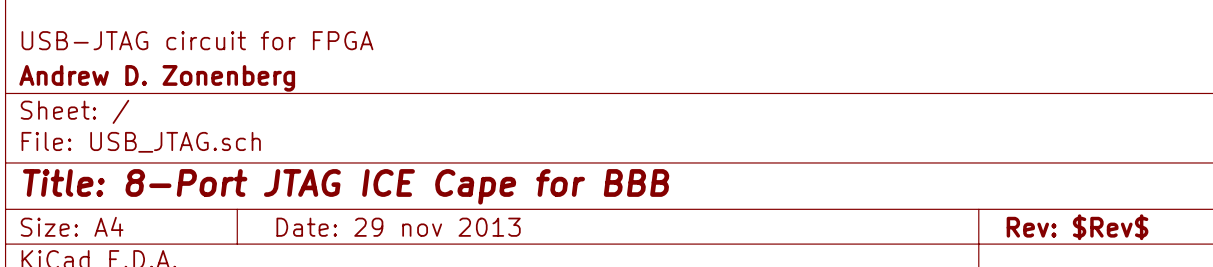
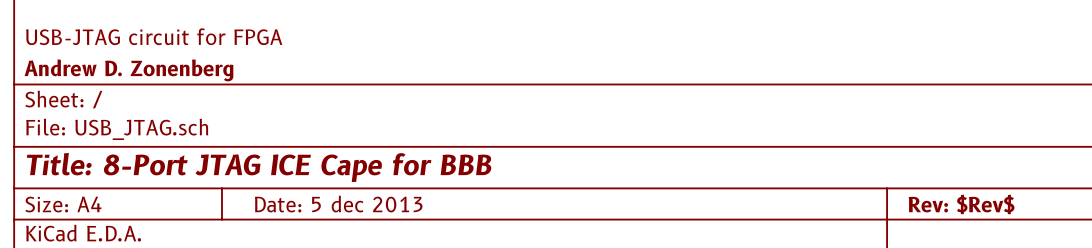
title block: Date: 29 nov 2013 (398, 227) -> Date: 5 dec 2013 (338, 204)

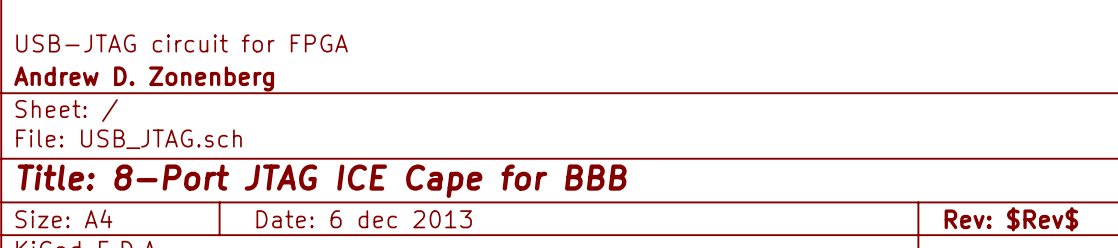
title block: Date: 5 dec 2013 (338, 204) -> Date: 6 dec 2013 (364, 219)

